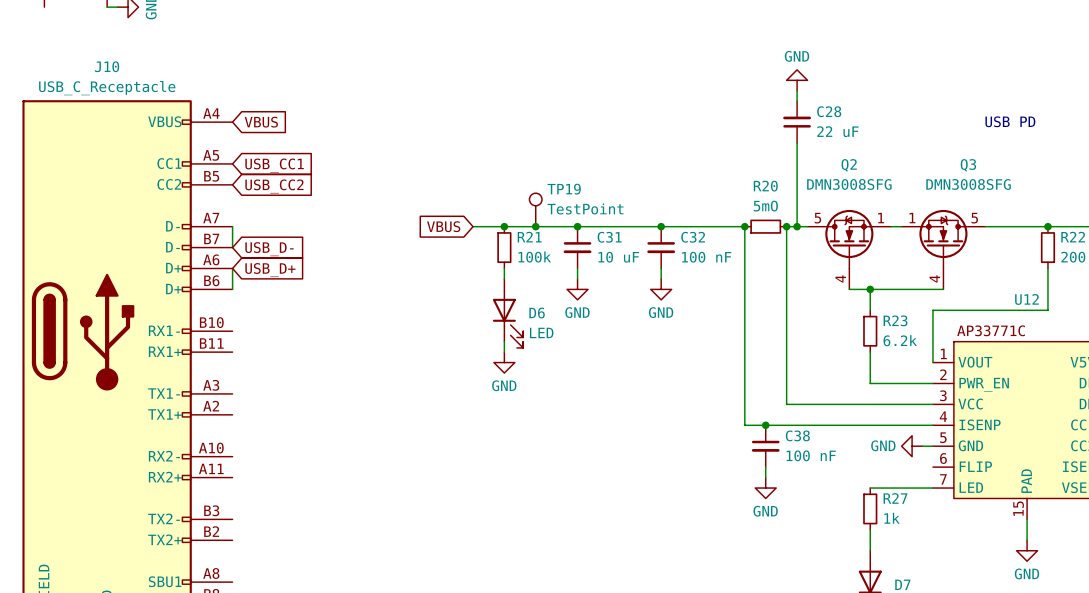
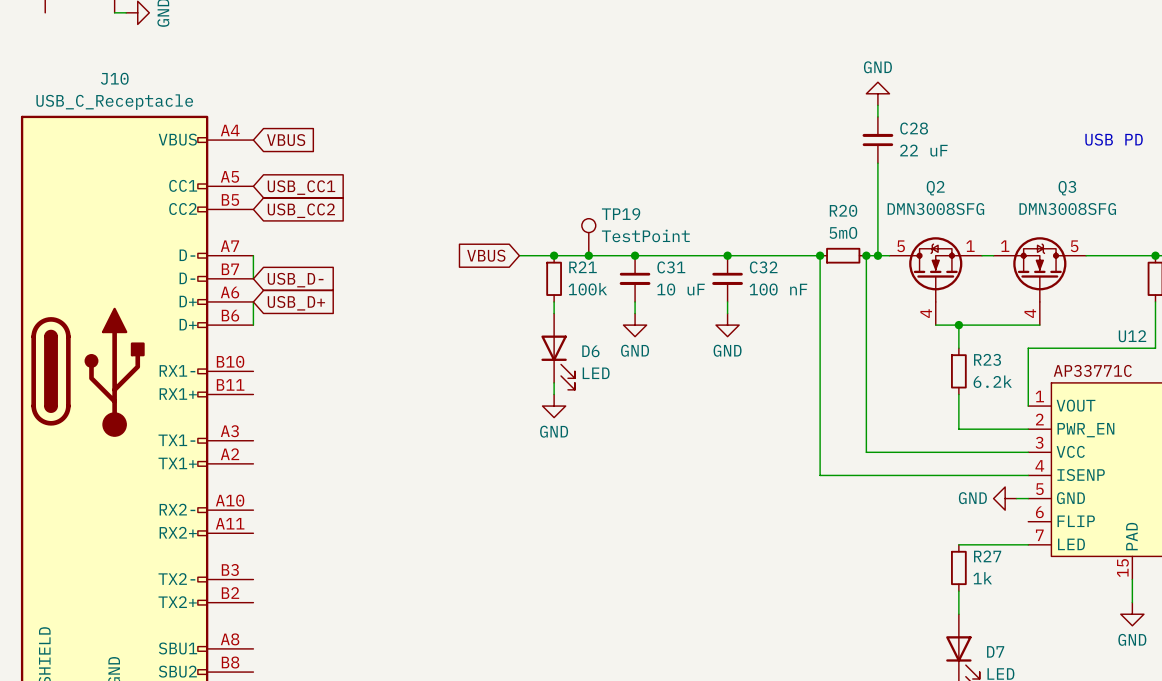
junction: (765, 425) -> none
C38: 100 nF (765, 446) -> none
wire: (765, 467) (765, 477) -> none
power symbol: GND (765, 488) -> none

